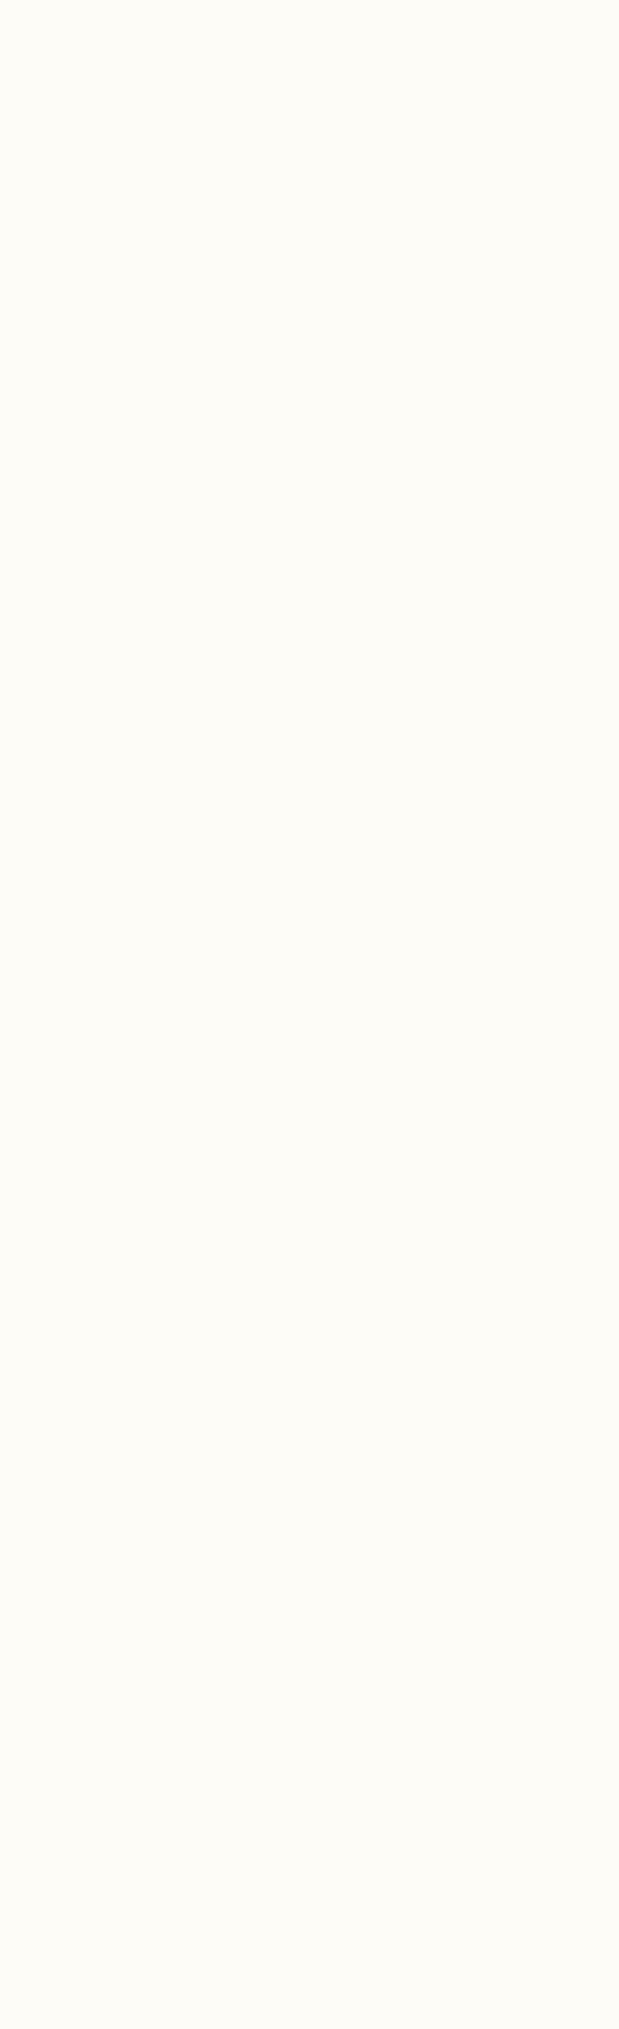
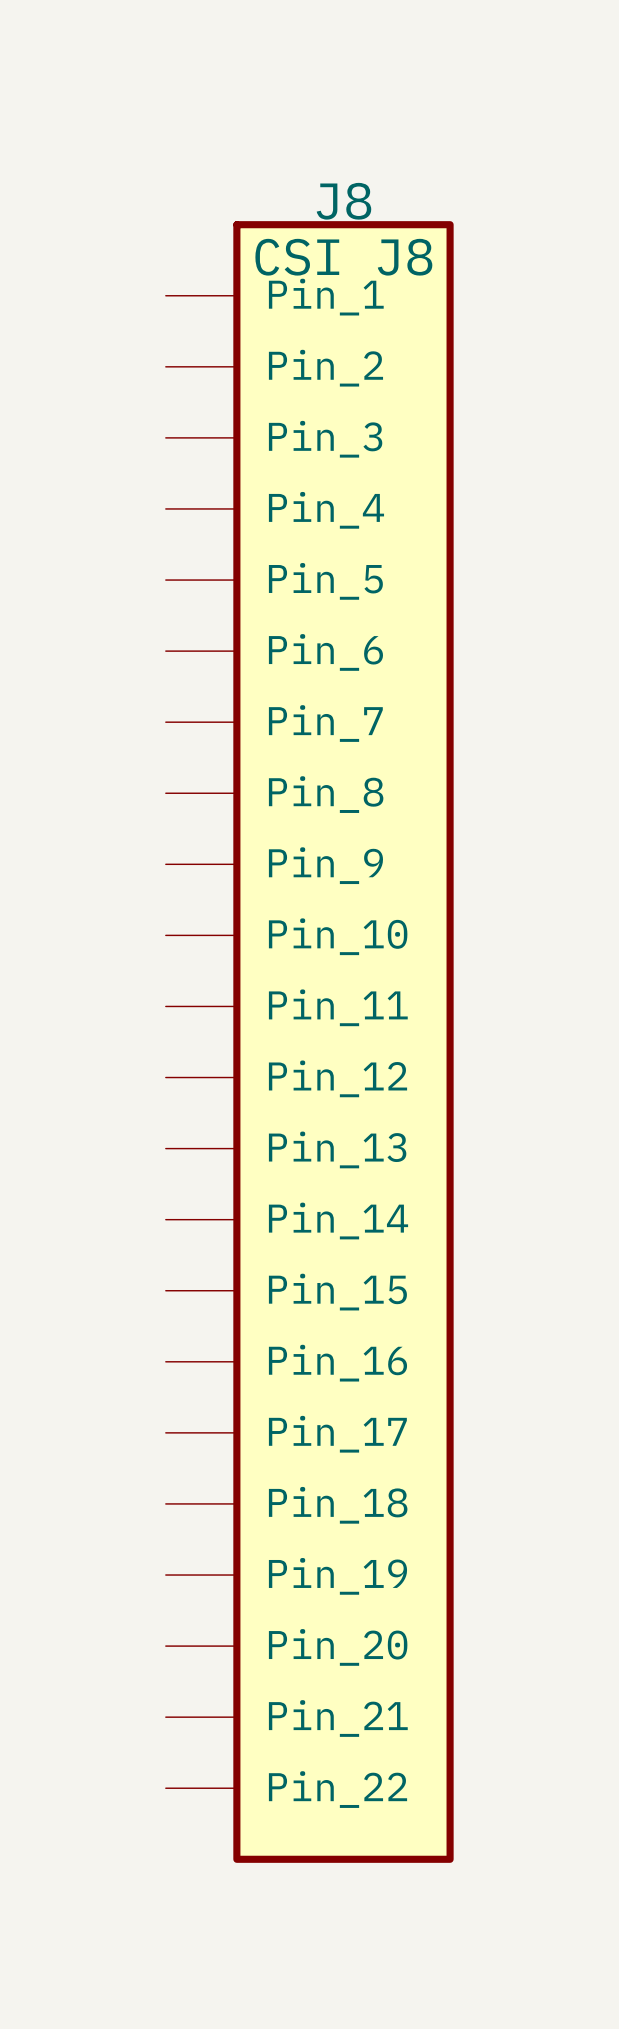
J8: none -> CSI J8 (309, 1041)

